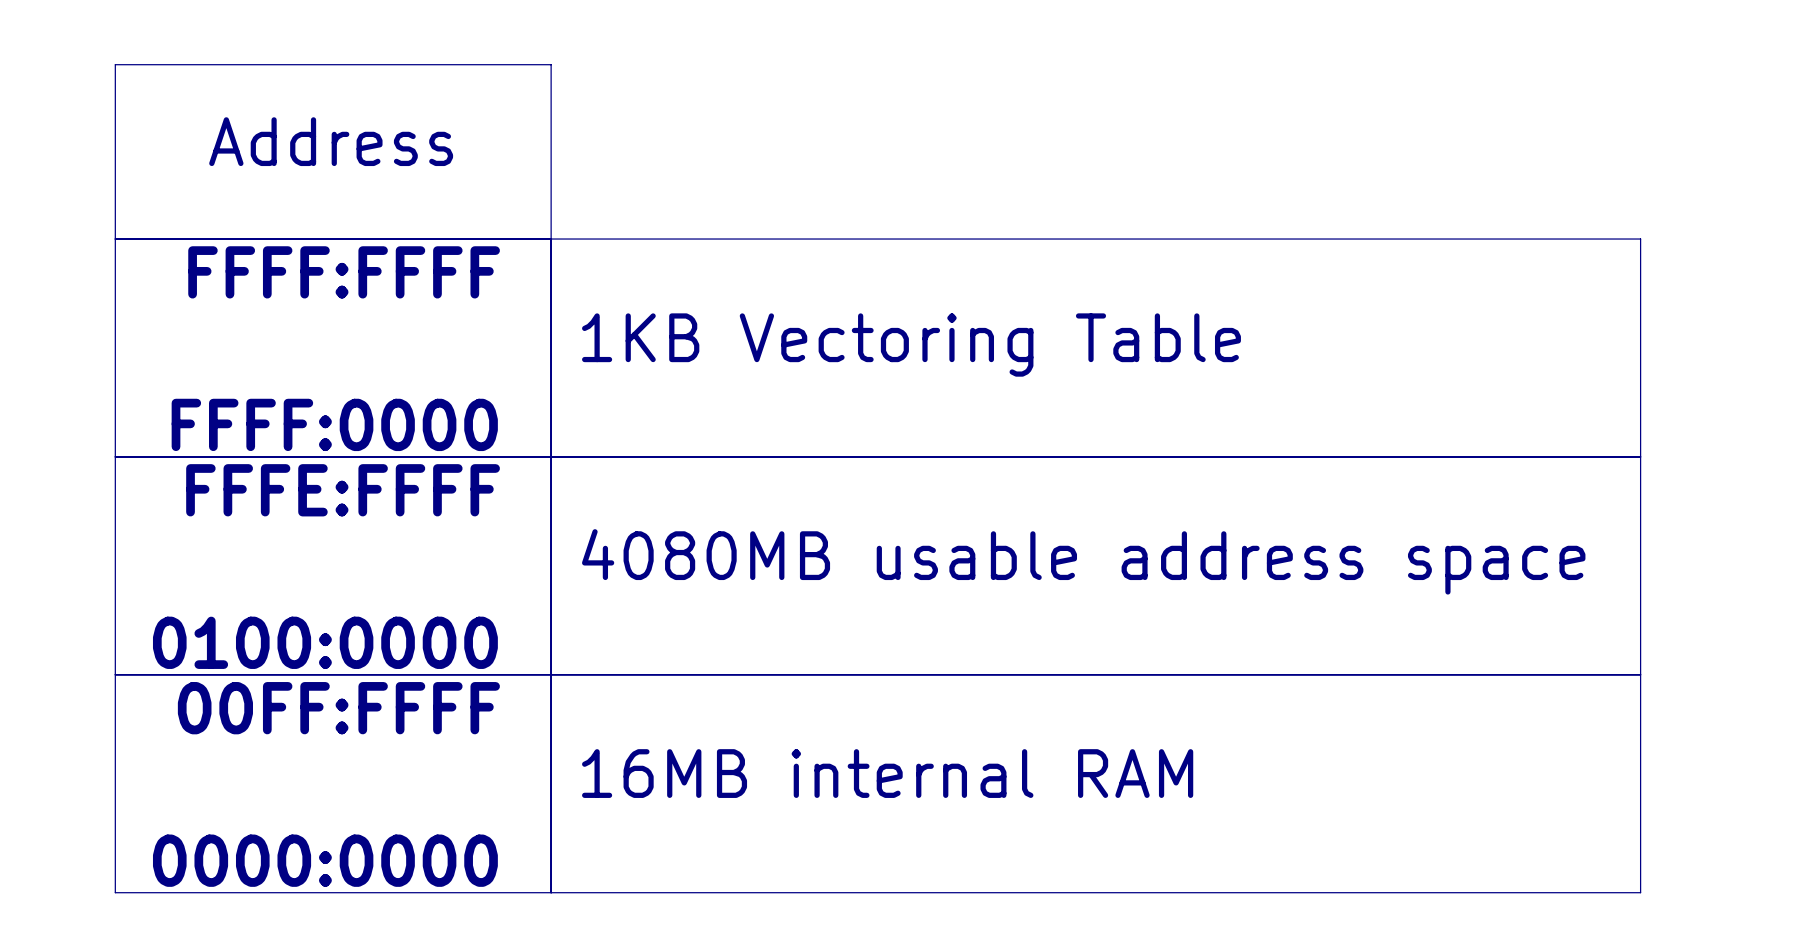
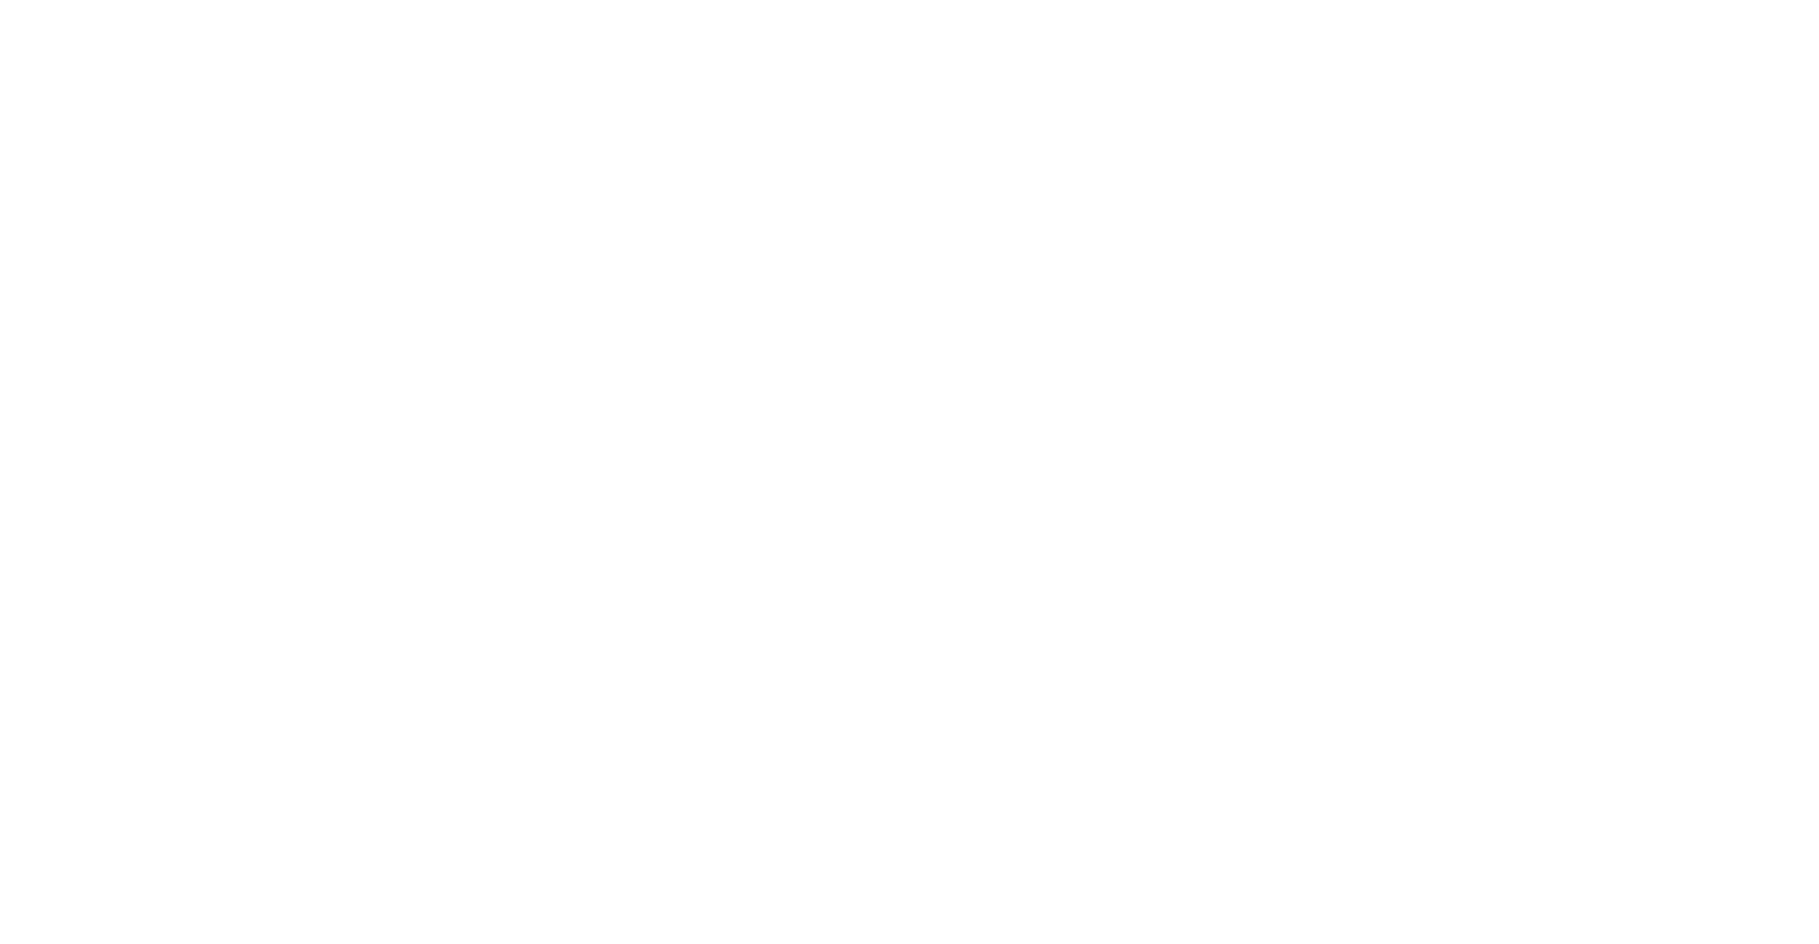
text: Address (331, 141) -> none
line: (115, 239) (1640, 239) (1640, 892) (115, 892) (115, 64) (551, 64) (551, 892) -> none
text: FFFF:FFFF (344, 272) -> none
text: 1KB Vectoring Table (911, 345) -> none
text: FFFF:0000 (334, 424) -> none
line: (115, 456) (1640, 456) -> none
text: FFFE:FFFF (343, 490) -> none
text: 4080MB usable address space (1083, 561) -> none
text: 0100:0000 (325, 642) -> none
line: (115, 674) (1640, 674) -> none
text: 00FF:FFFF (338, 708) -> none
text: 16MB internal RAM (887, 773) -> none
text: 0000:0000 (325, 860) -> none

